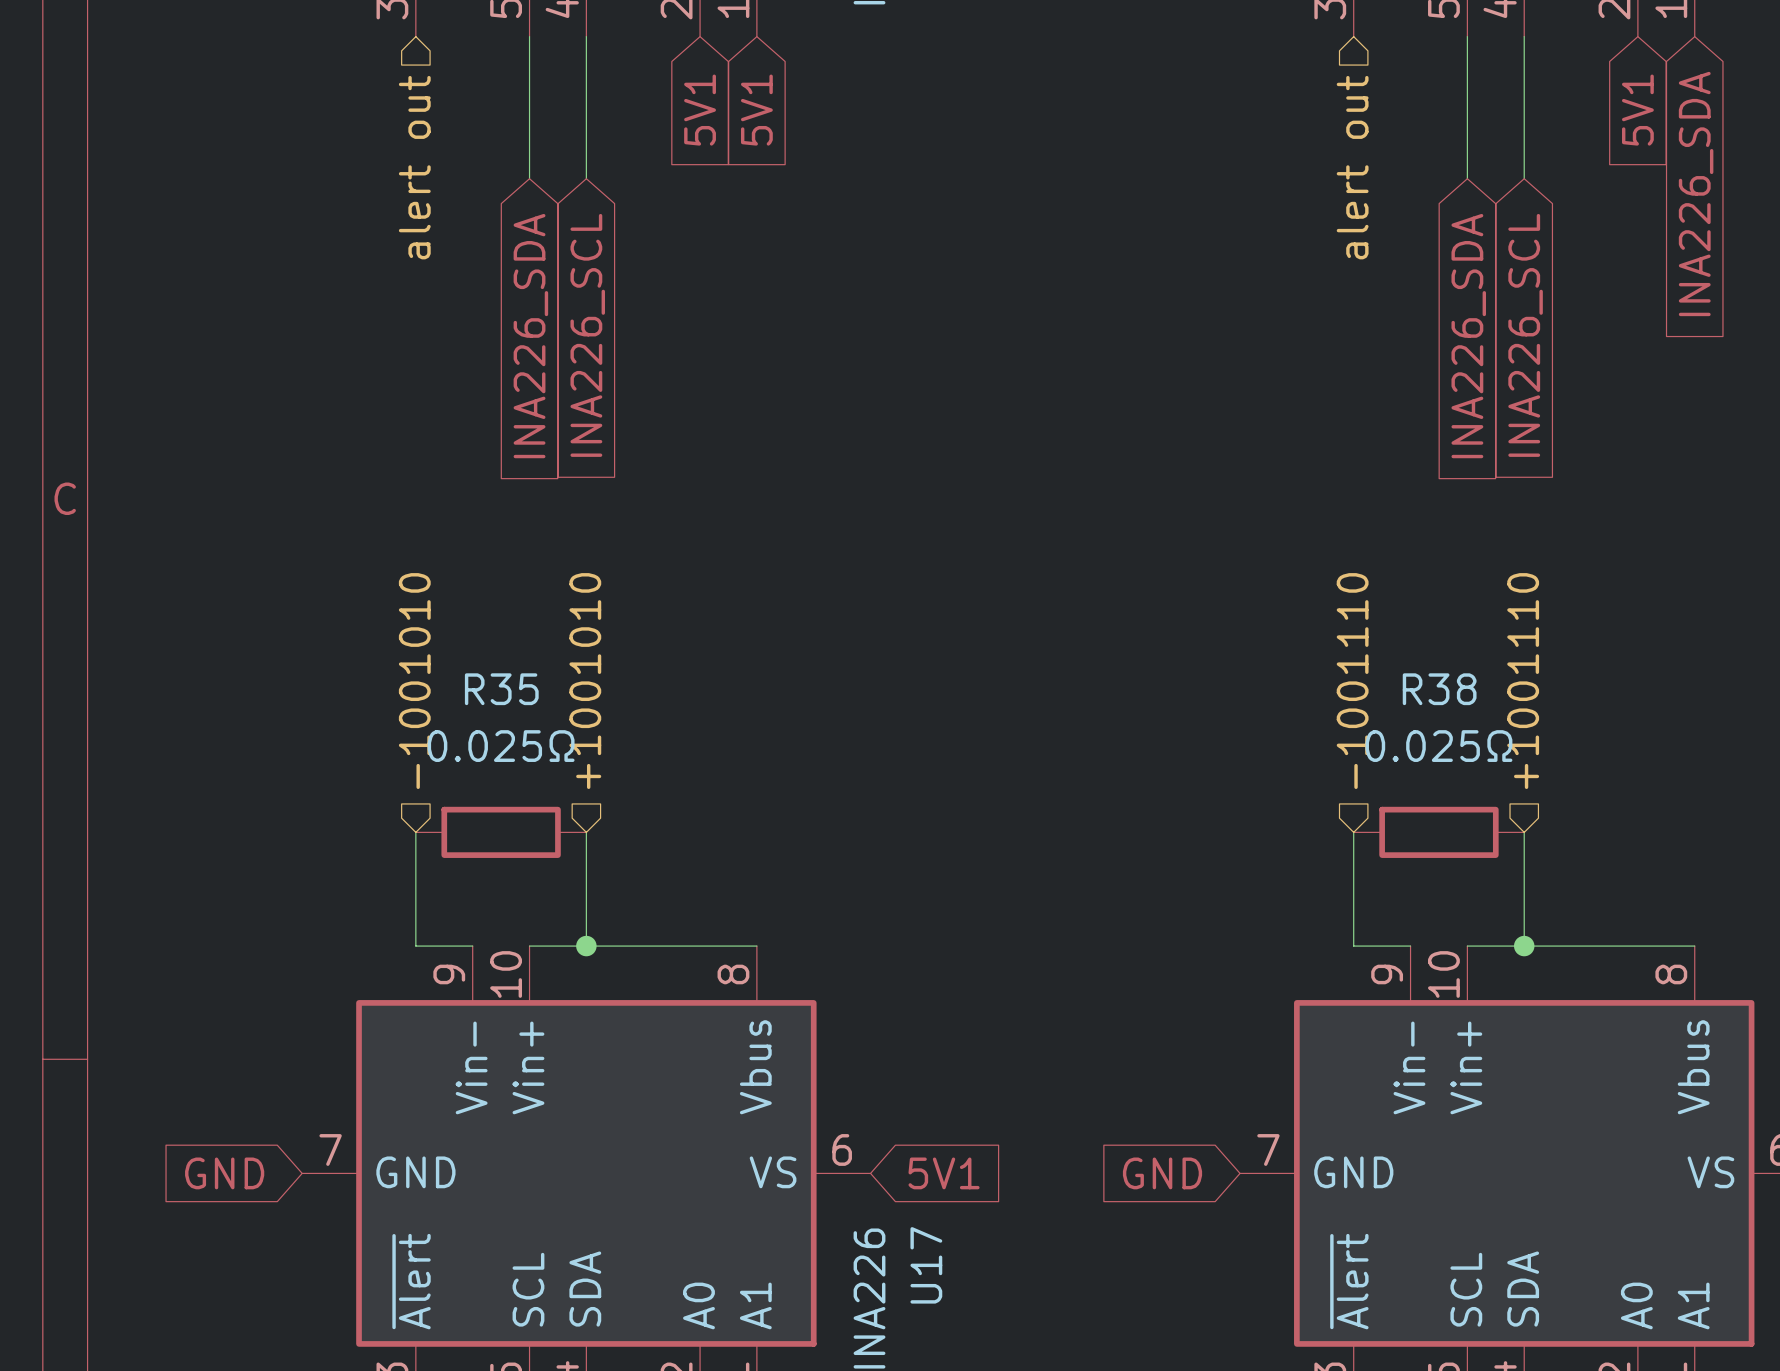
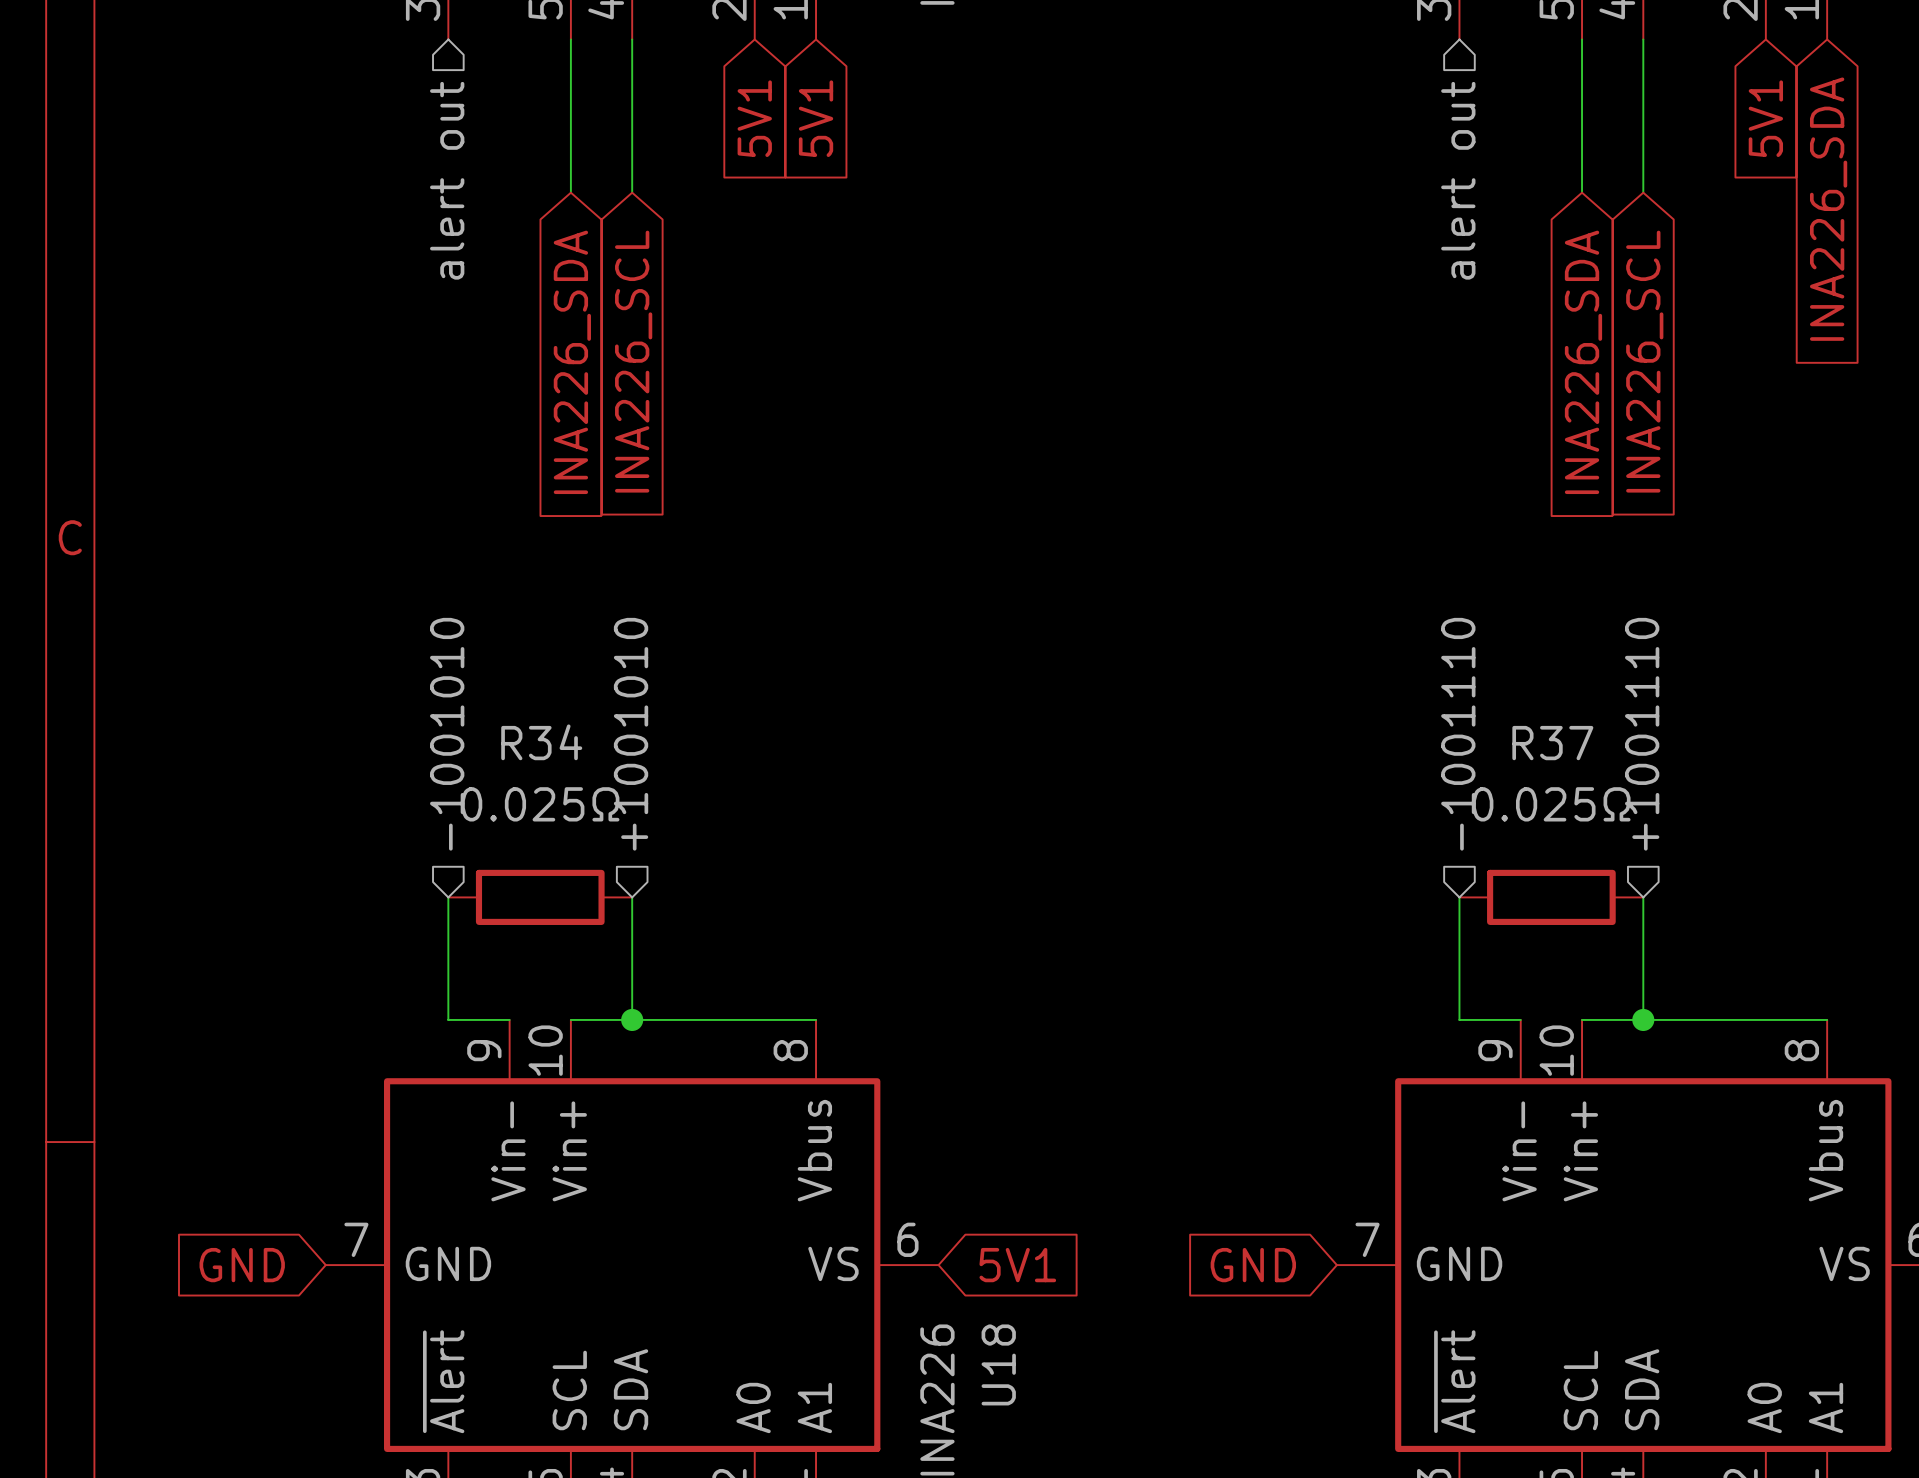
R35 name: R35 (501, 689) -> R34 (541, 742)
R38 name: R38 (1439, 689) -> R37 (1552, 743)
U17 name: U17 (926, 1265) -> U18 (998, 1364)

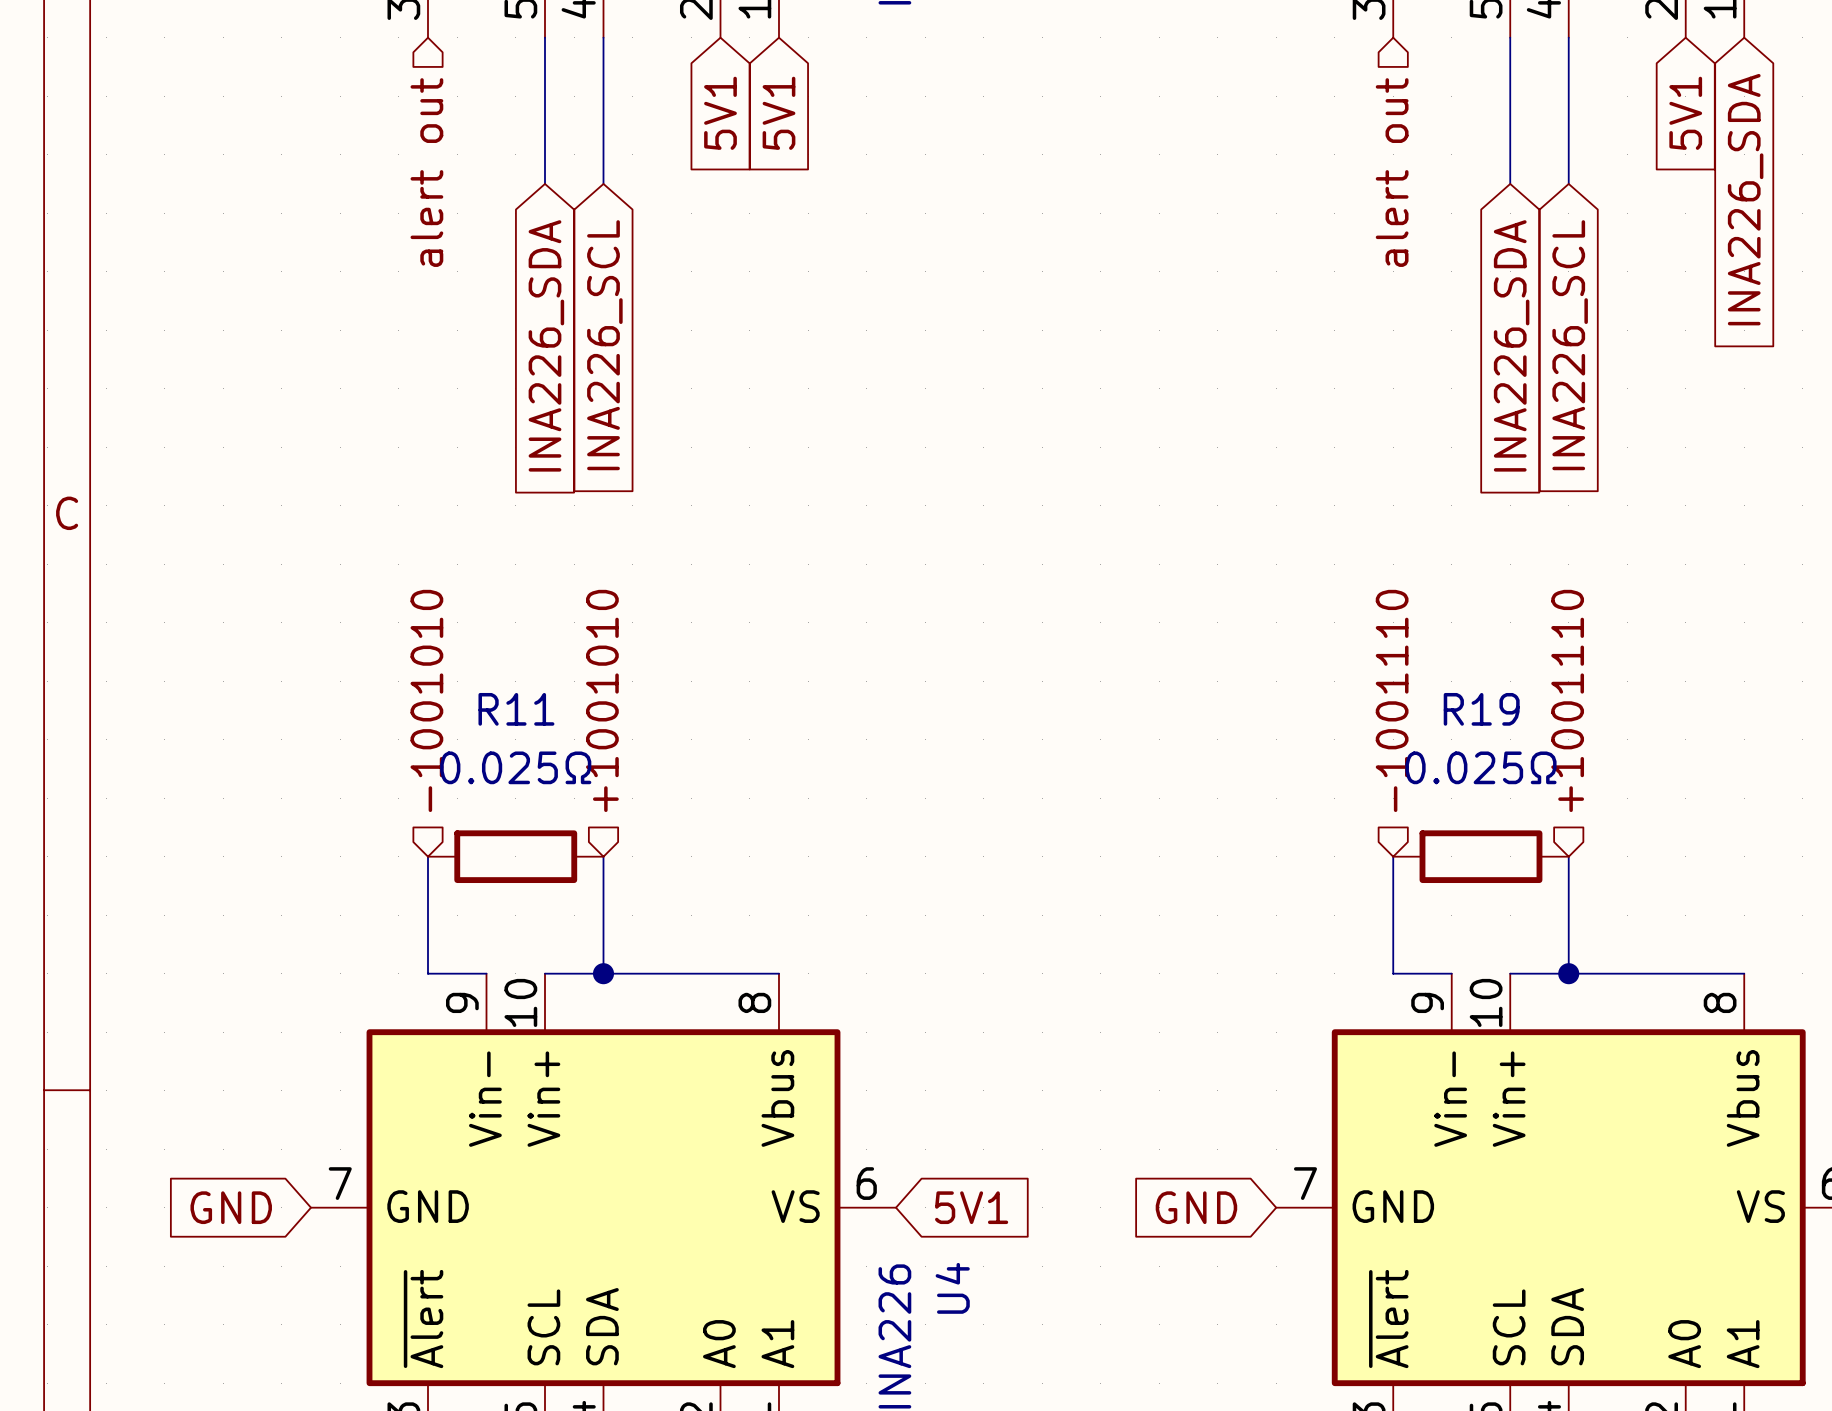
R34 name: R34 (541, 742) -> R11 (516, 709)
R37 name: R37 (1552, 743) -> R19 (1481, 709)
U18 name: U18 (998, 1364) -> U4 (952, 1288)

